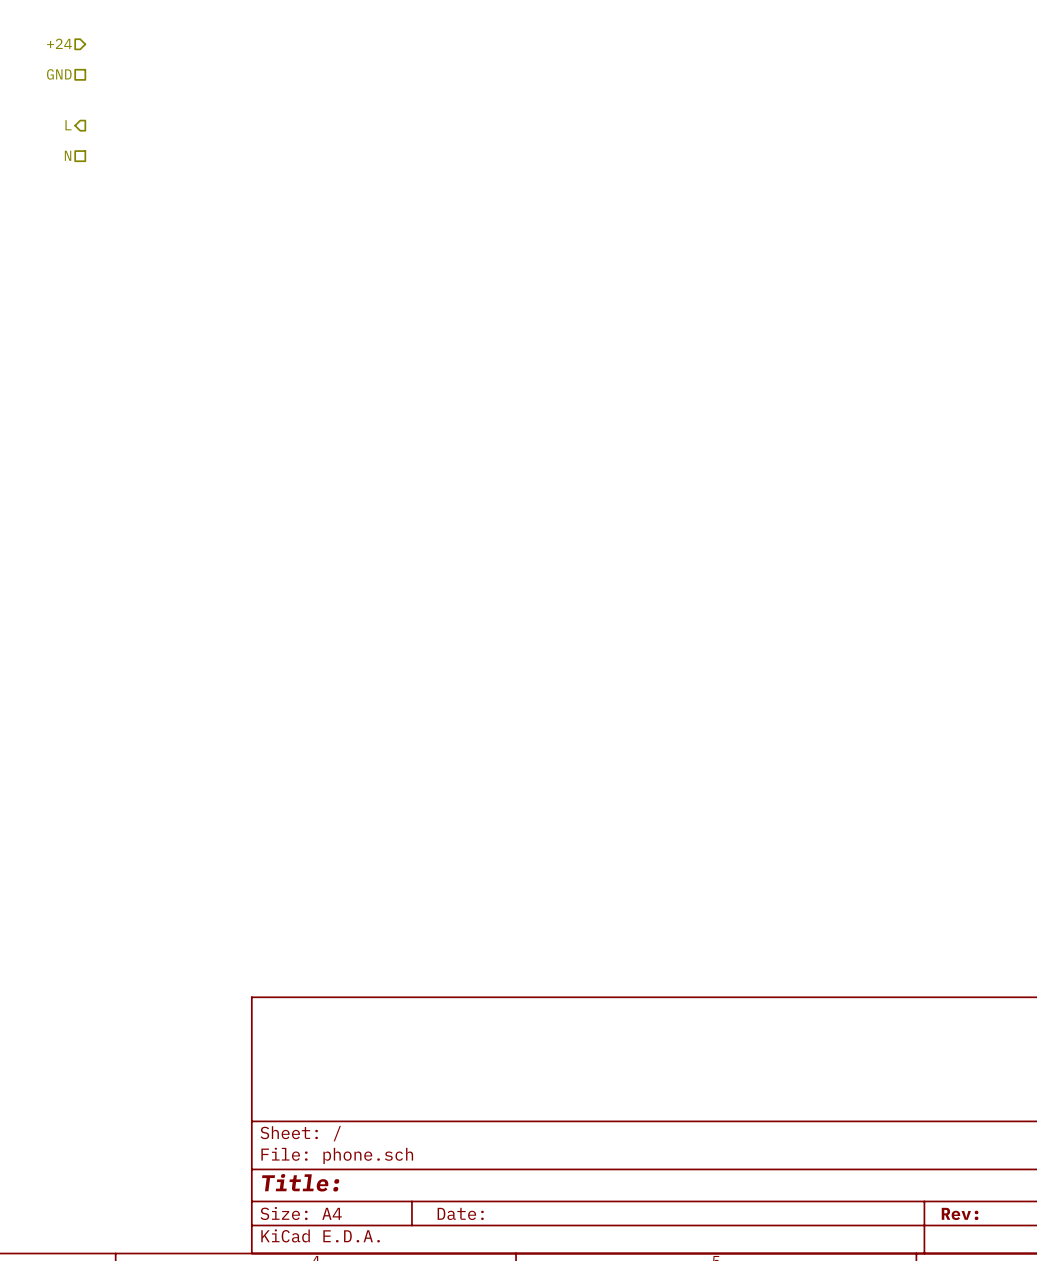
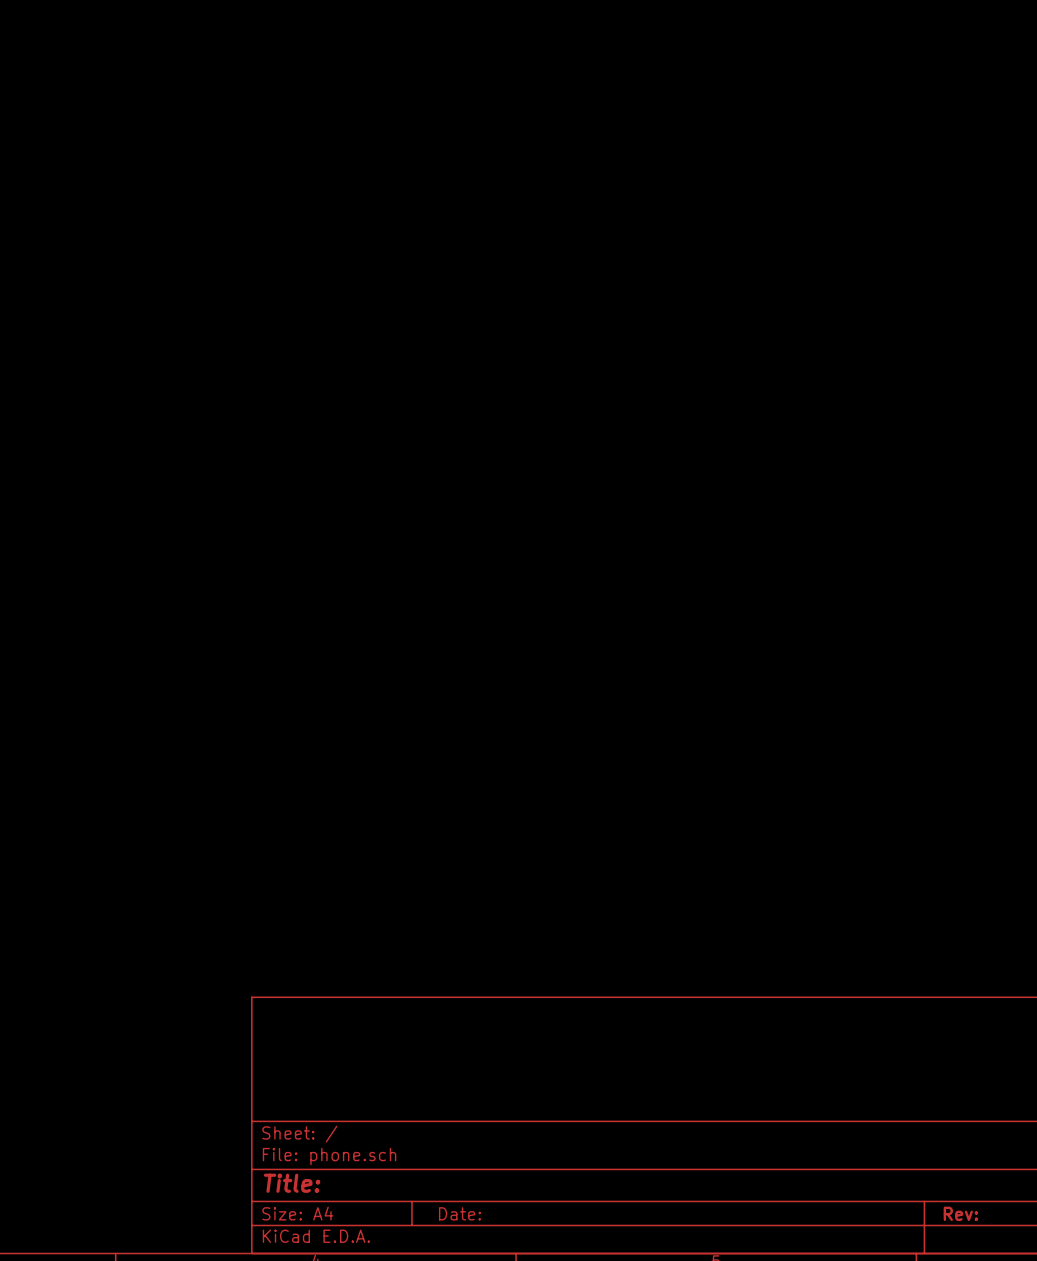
hierarchical label: +24 (59, 43) -> none
hierarchical label: GND (59, 74) -> none
hierarchical label: L (68, 125) -> none
hierarchical label: N (68, 155) -> none

